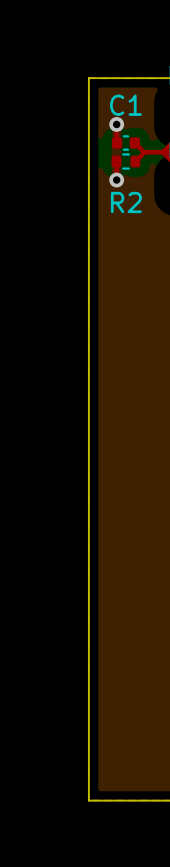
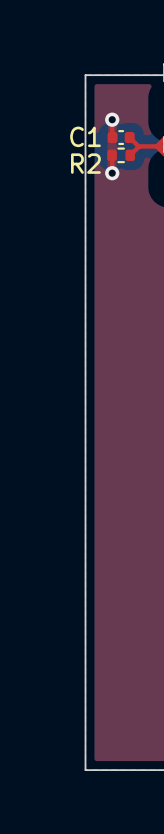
C1 name position: C1 (125, 105) -> C1 (85, 136)
R2 name position: R2 (126, 202) -> R2 (85, 163)

